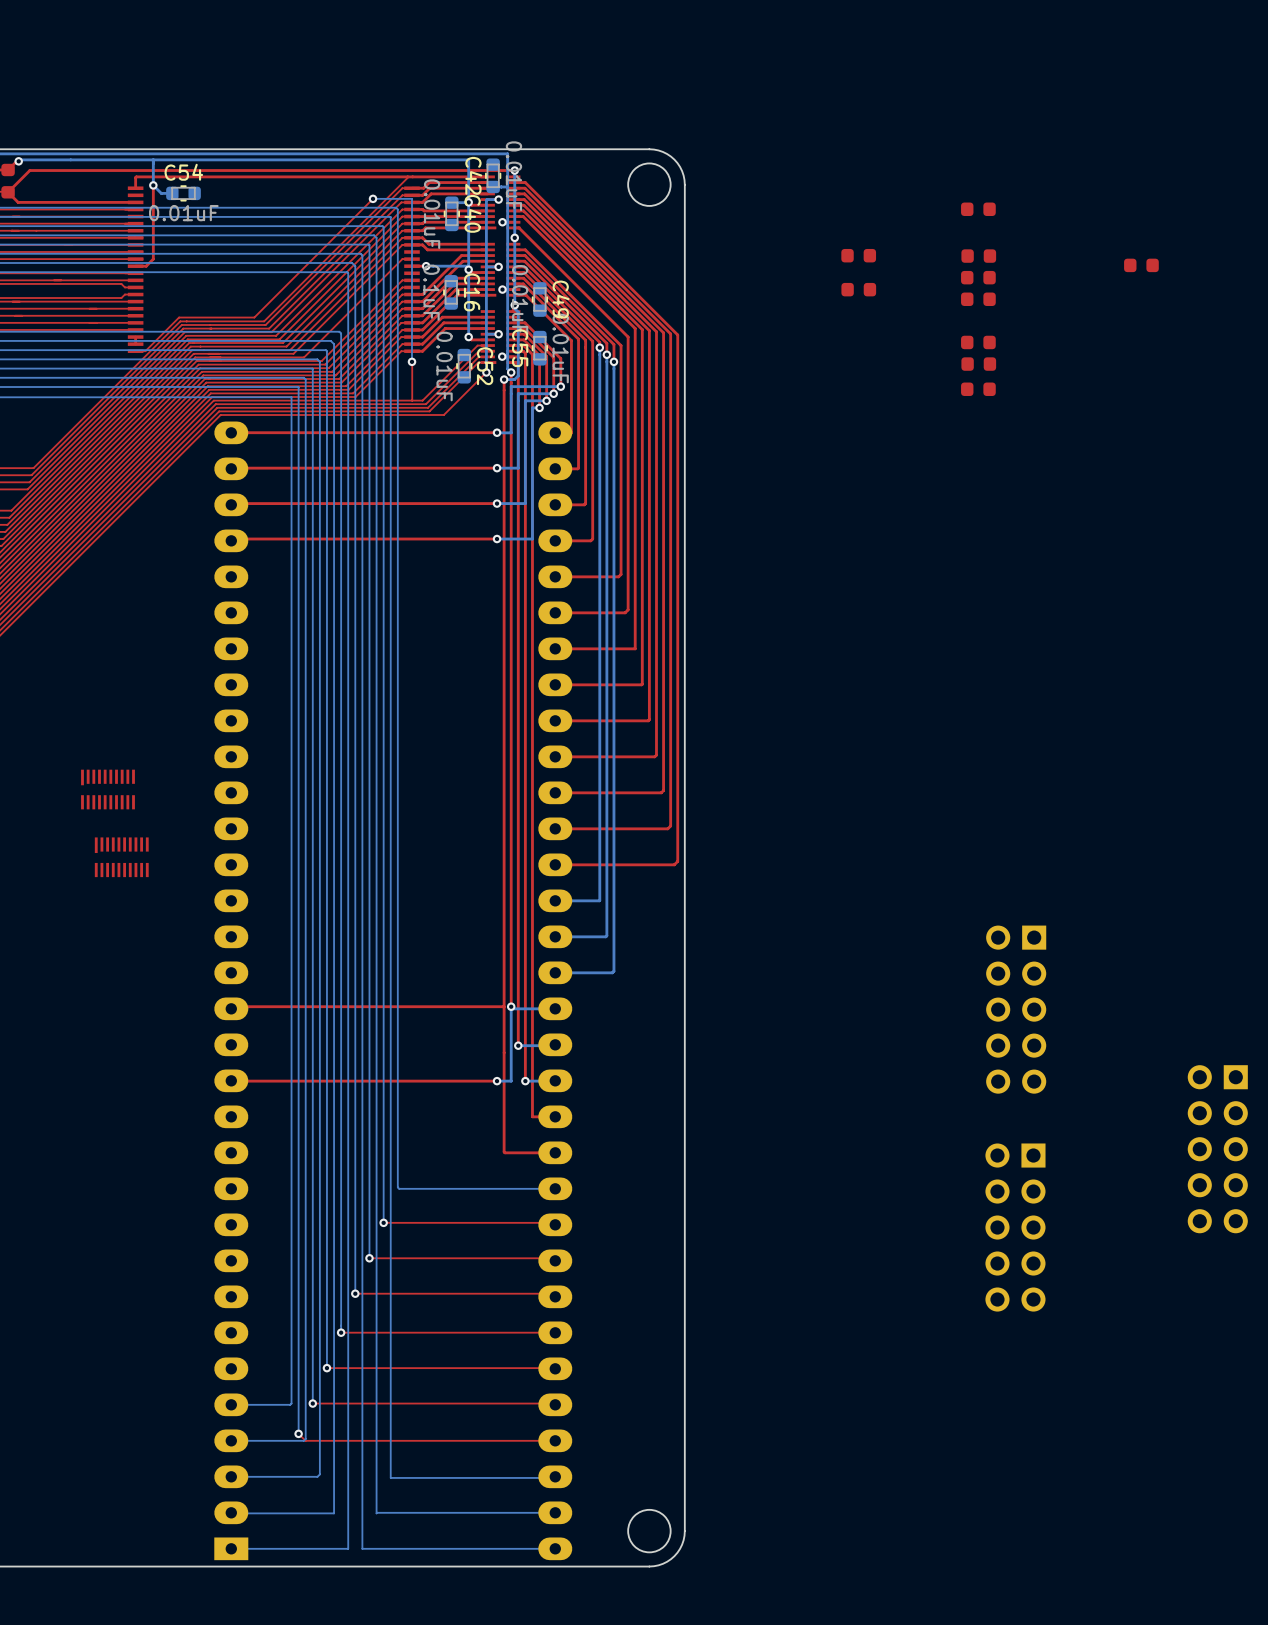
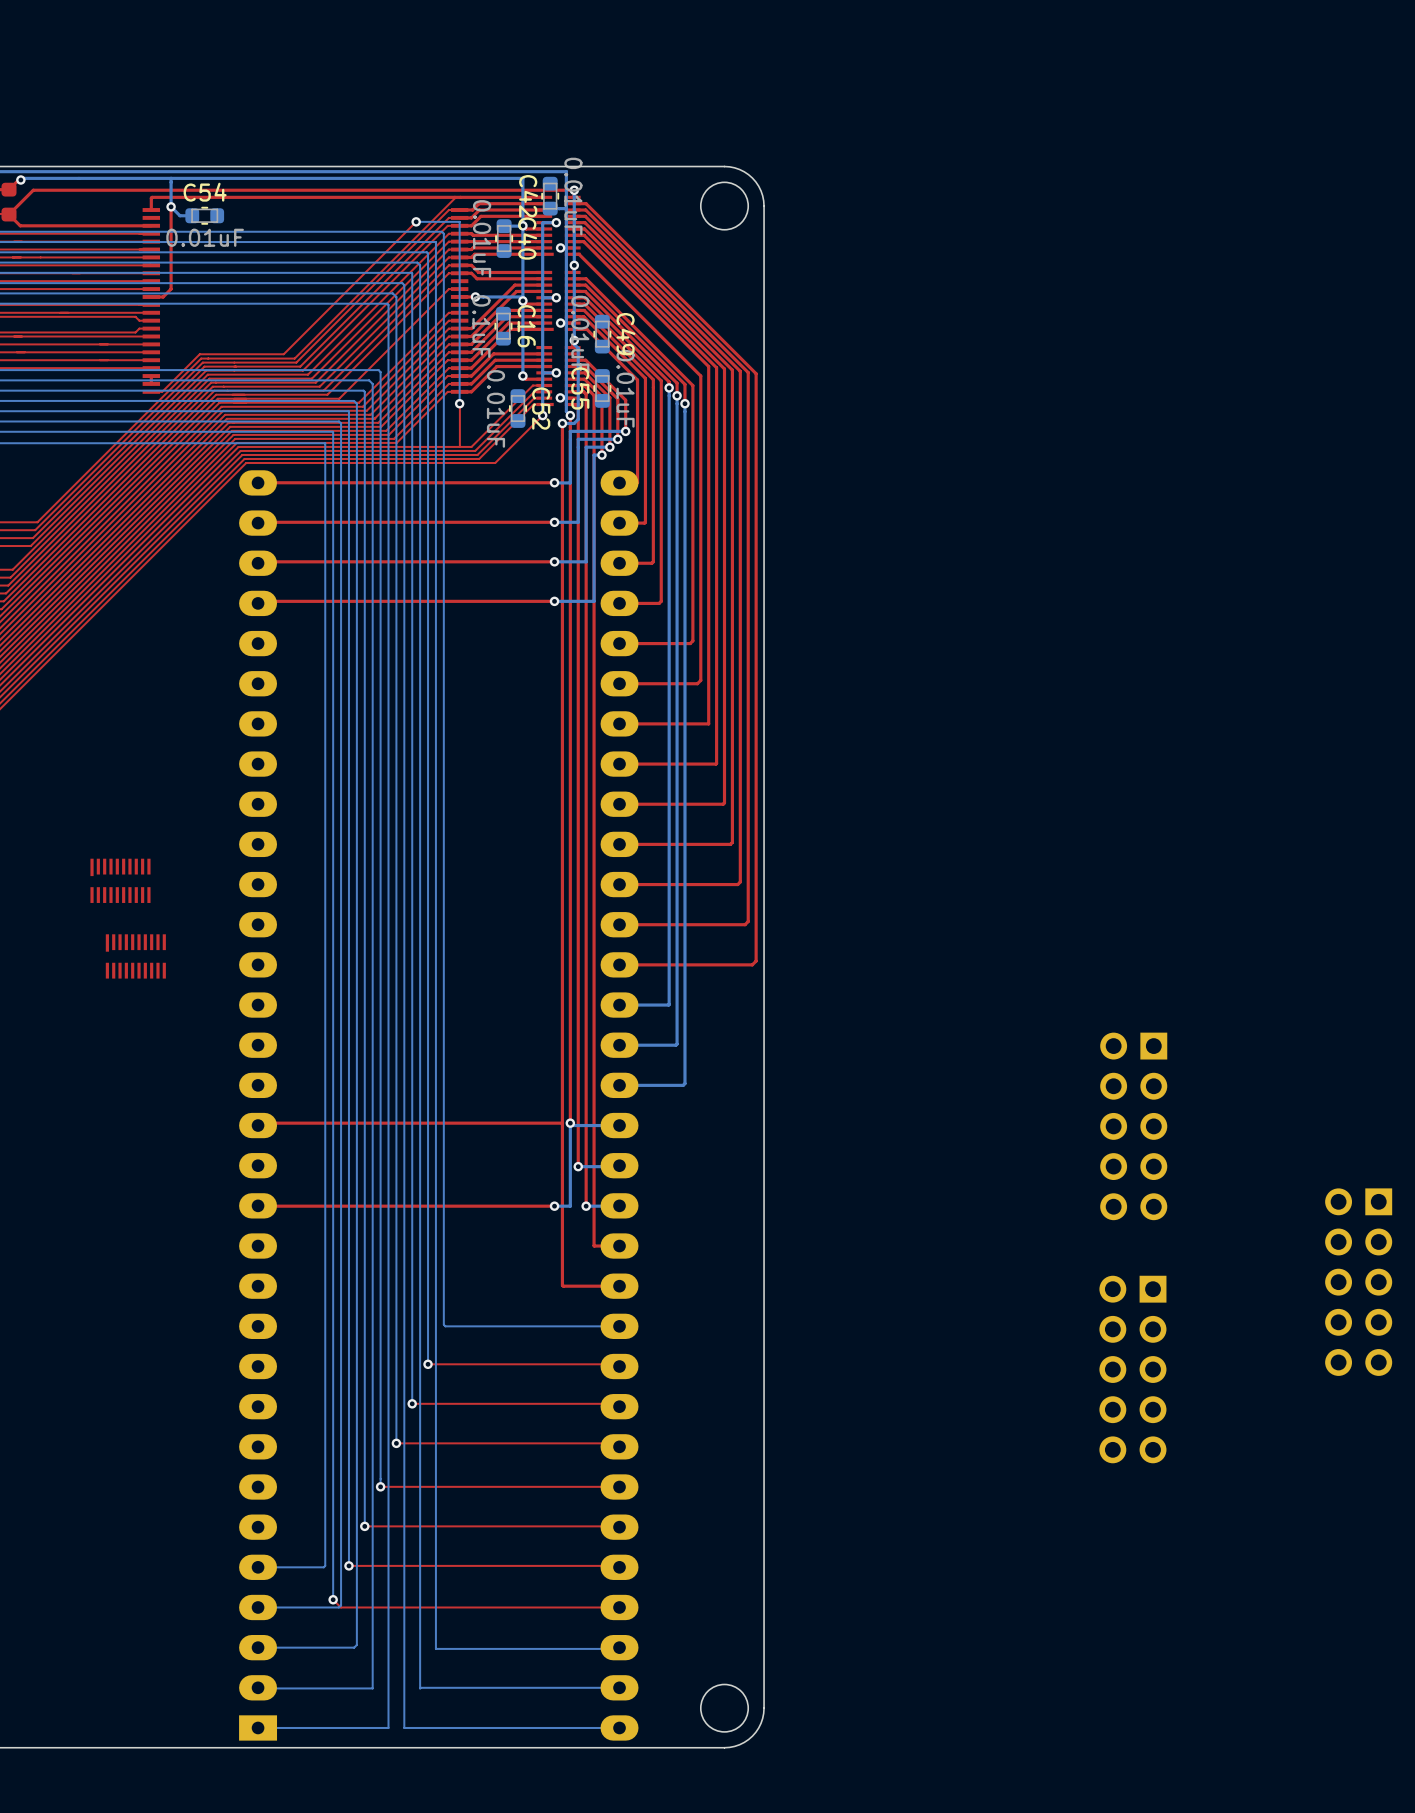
part: (978, 209) -> none
part: (858, 255) -> none
part: (978, 256) -> none
part: (1141, 265) -> none
part: (978, 277) -> none
part: (858, 289) -> none
part: (978, 299) -> none
part: (978, 342) -> none
part: (978, 364) -> none
part: (978, 389) -> none

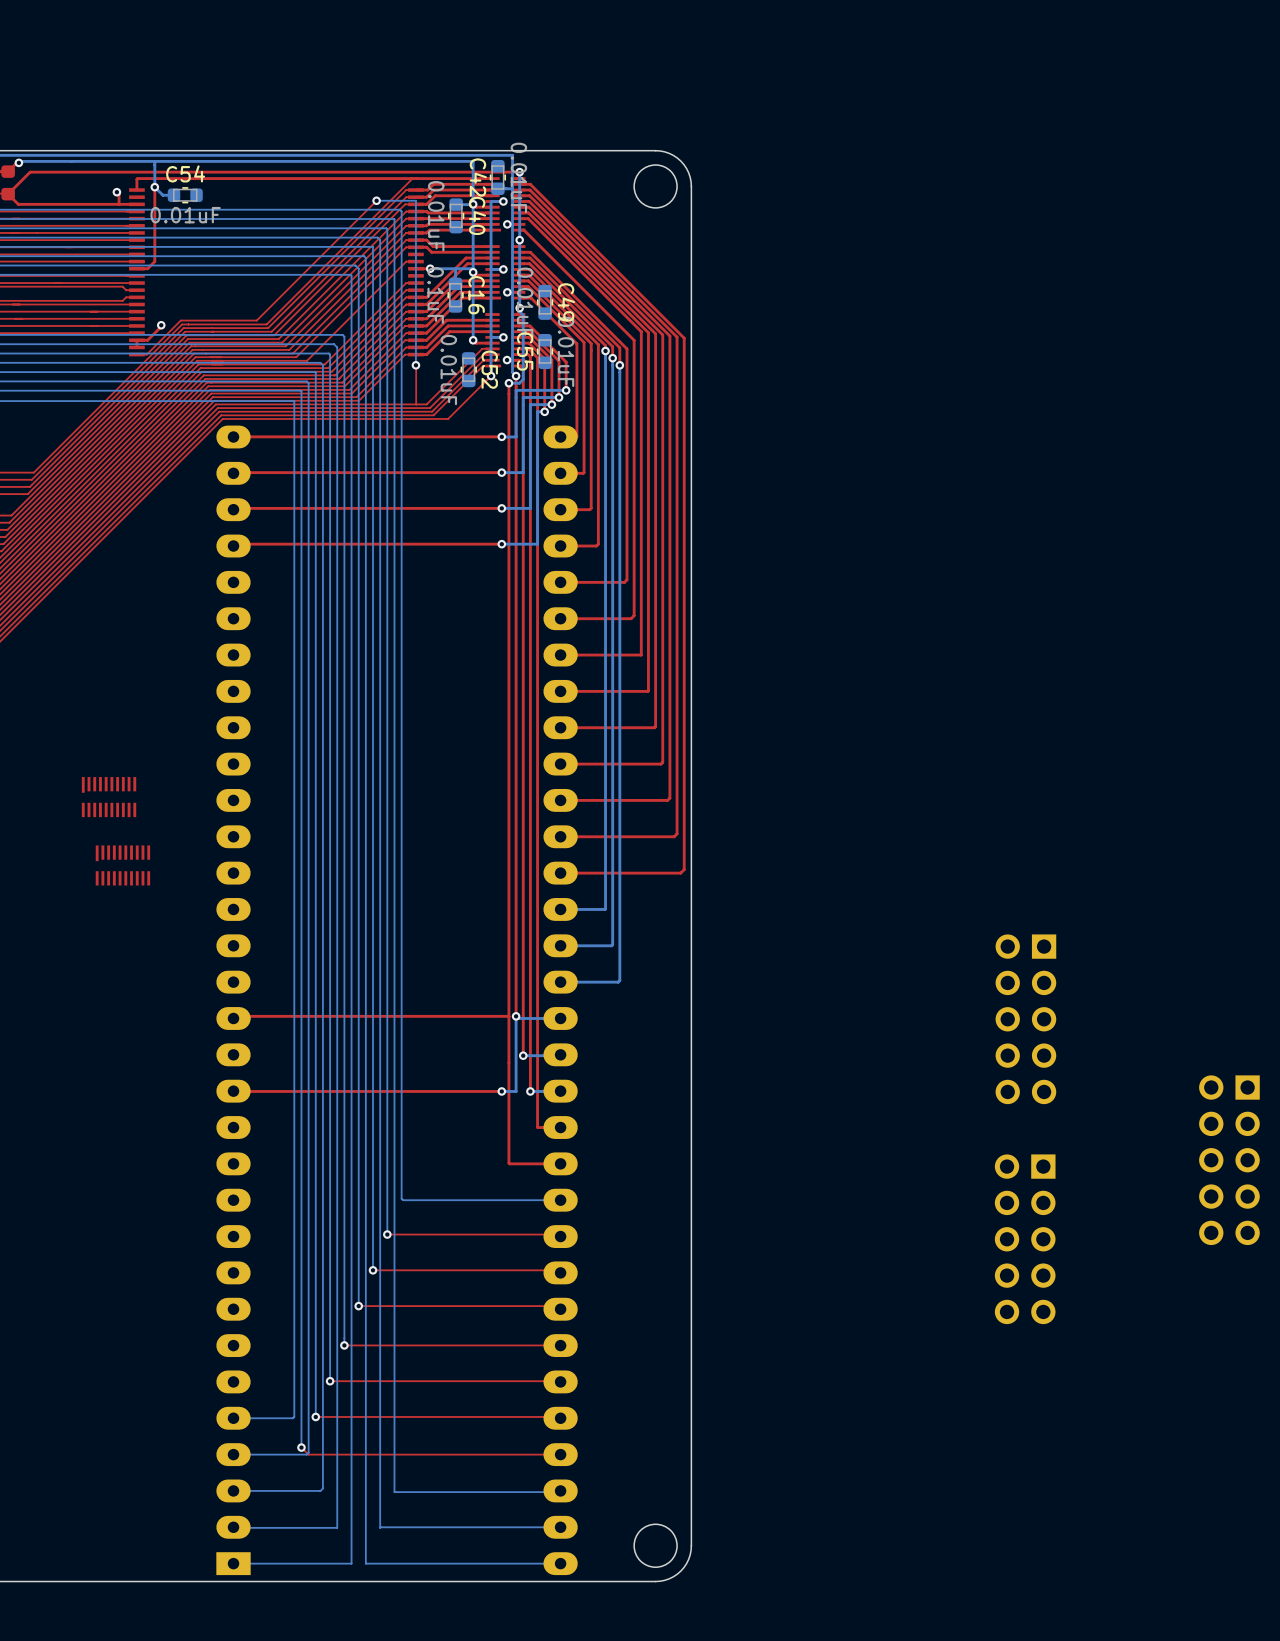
top track: none -> (116, 192) (119, 194) (119, 204)
via: none -> (116, 192)
bottom track: none -> (456, 268) (455, 283)
top track: none -> (161, 325) (147, 340) (136, 340)
via: none -> (161, 325)

